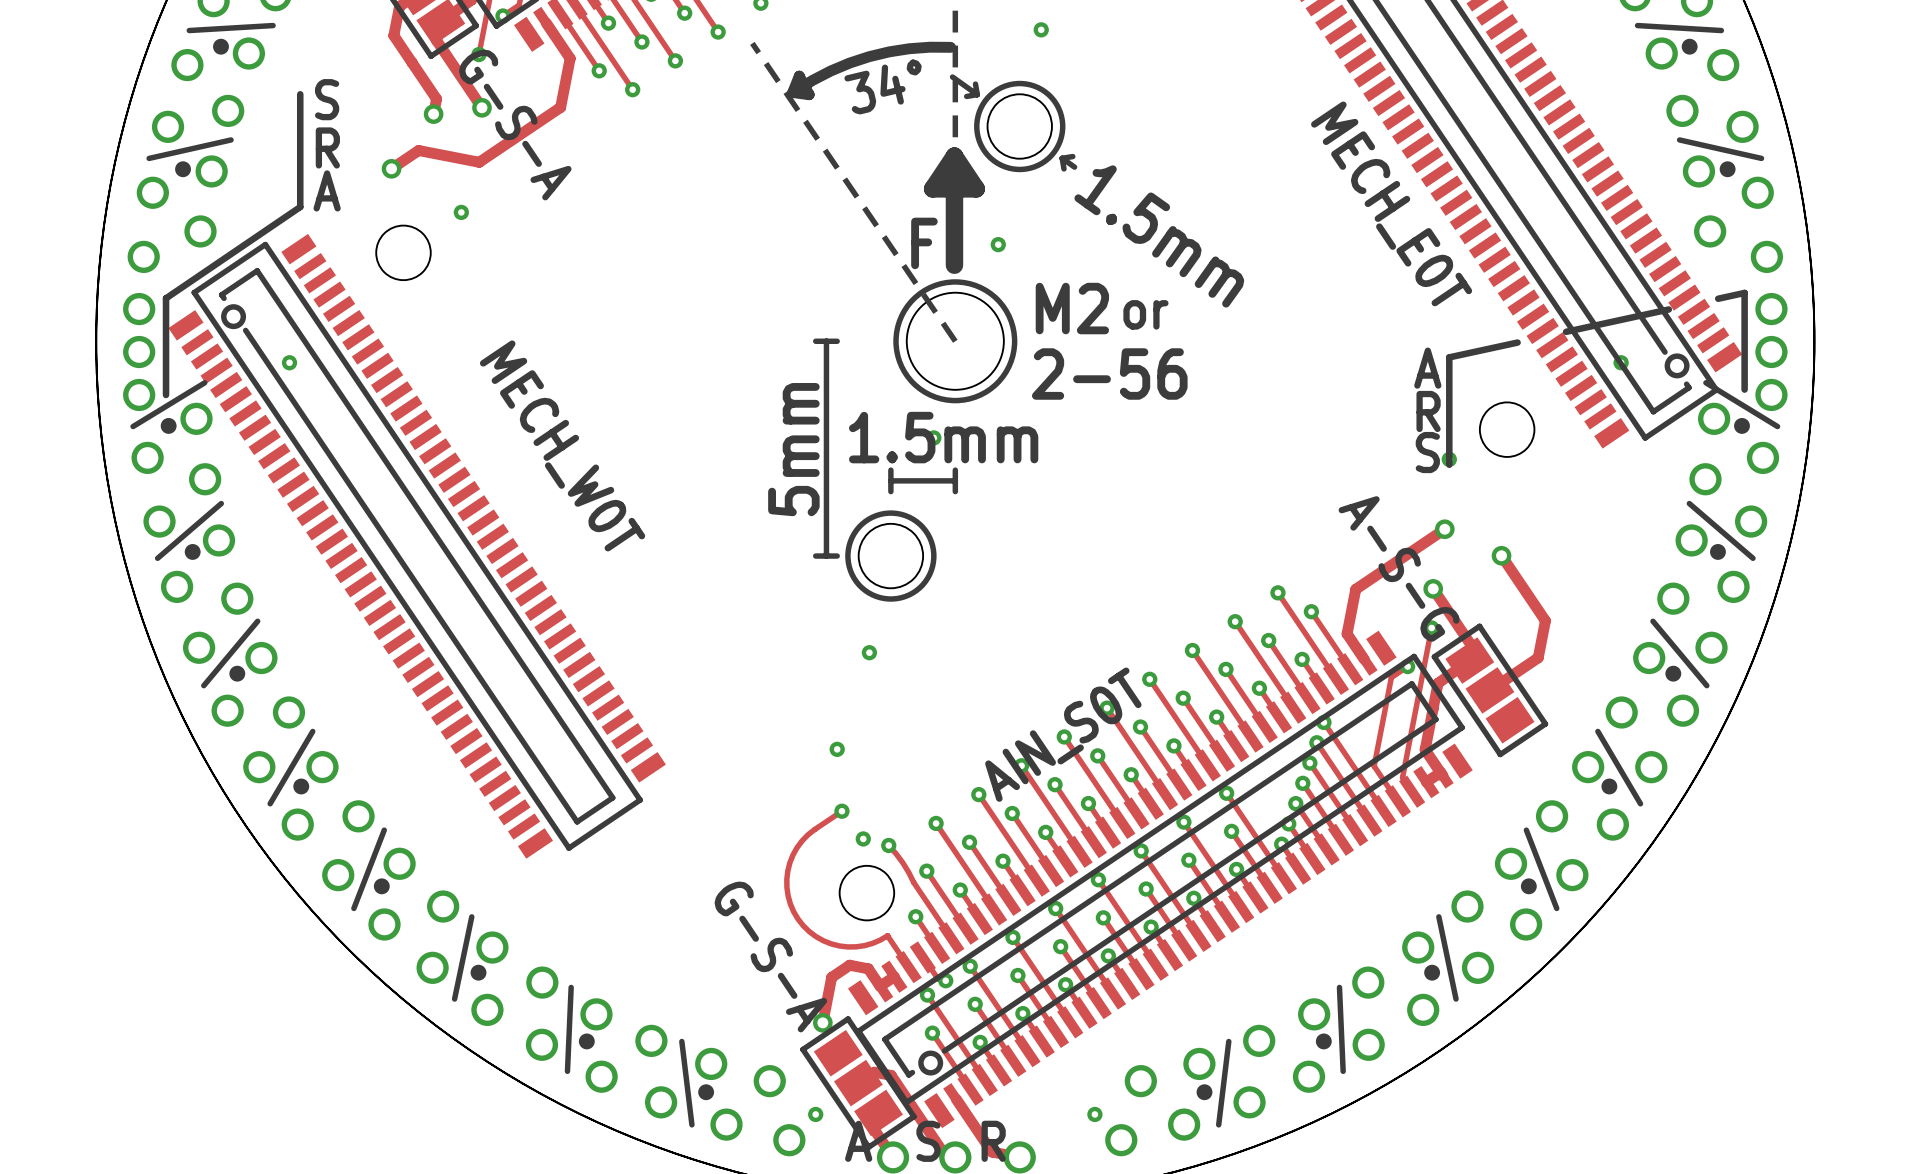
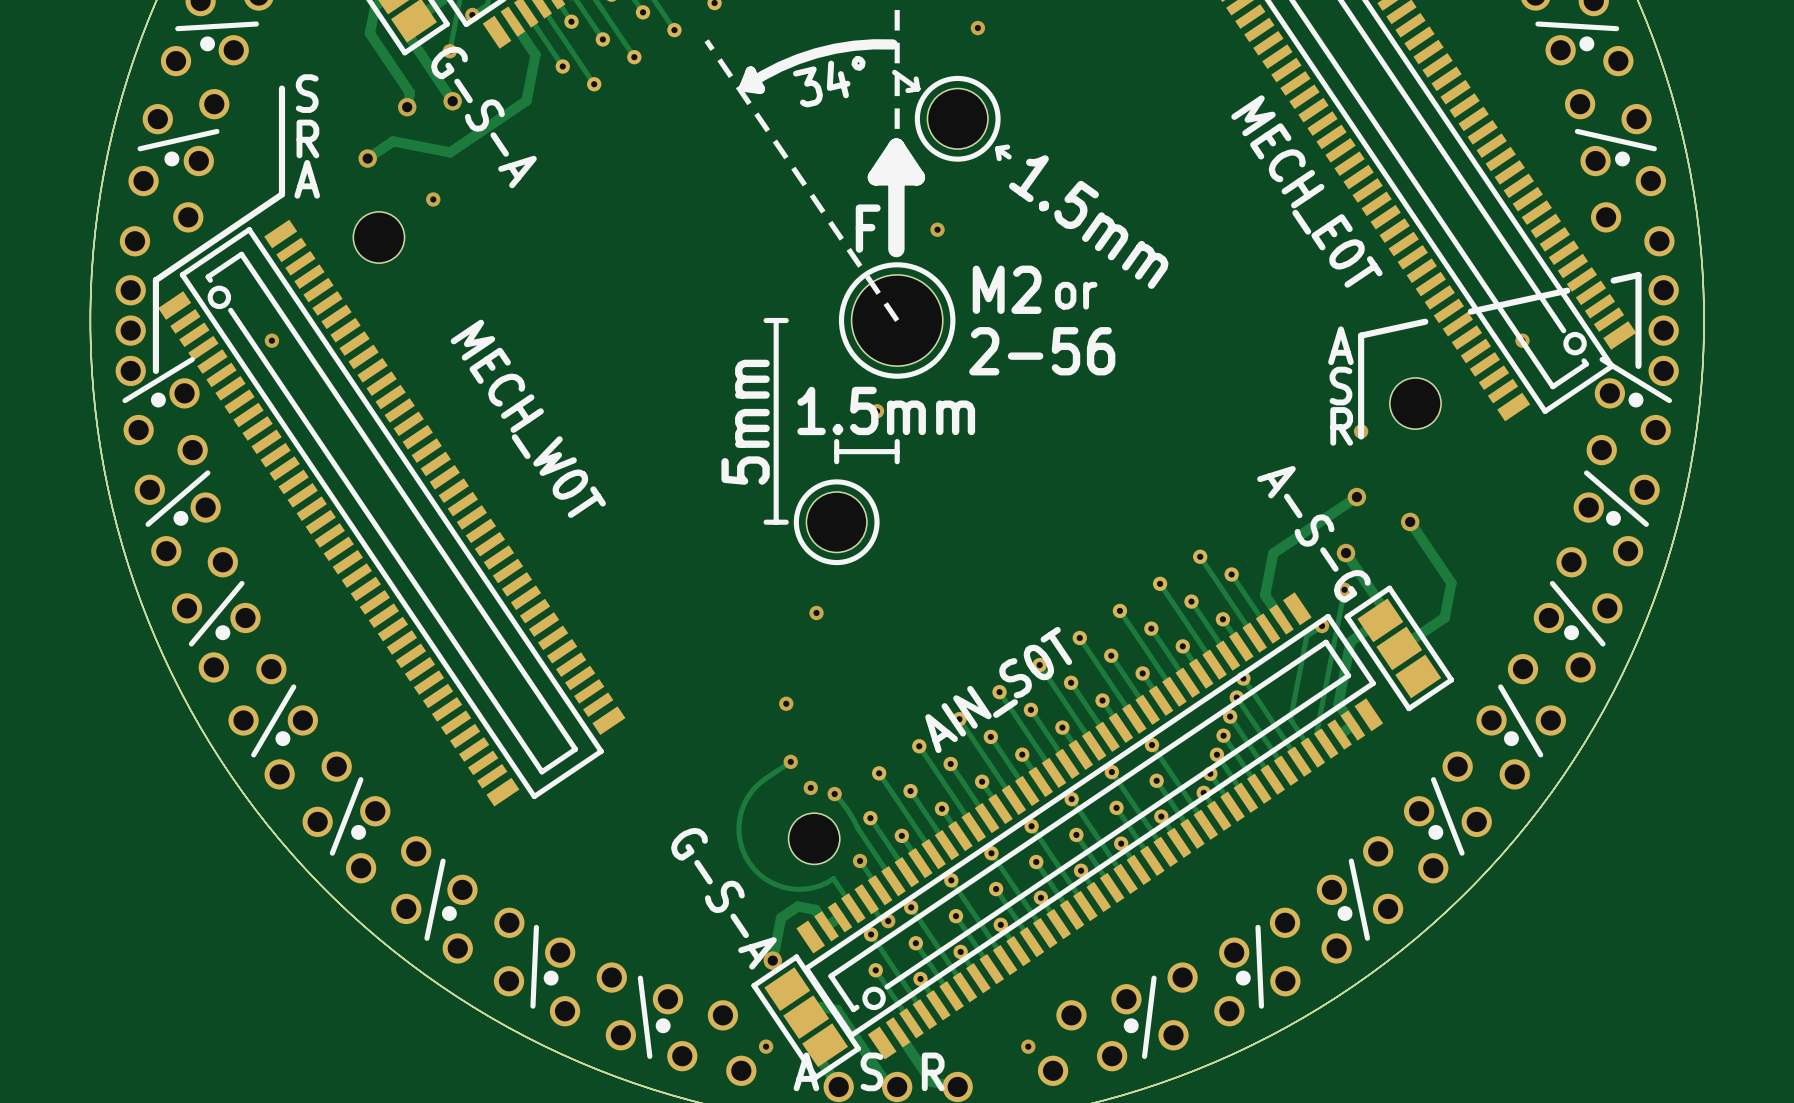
text position: R (1428, 411) -> R (1341, 426)
text position: S (1427, 452) -> S (1340, 386)

